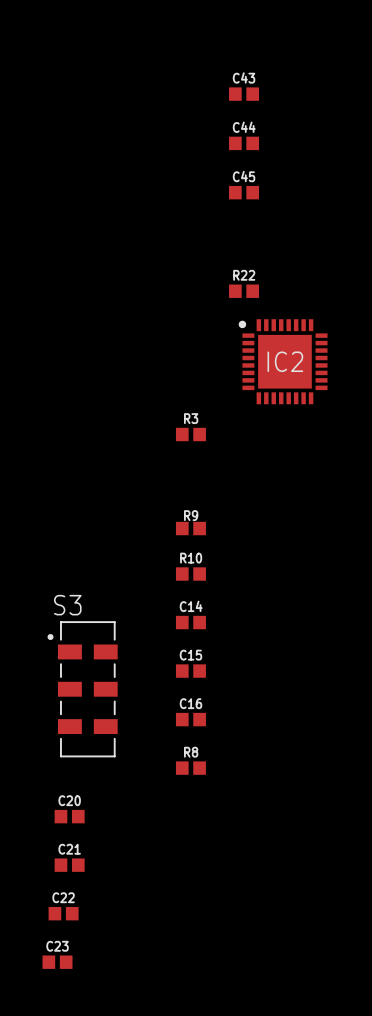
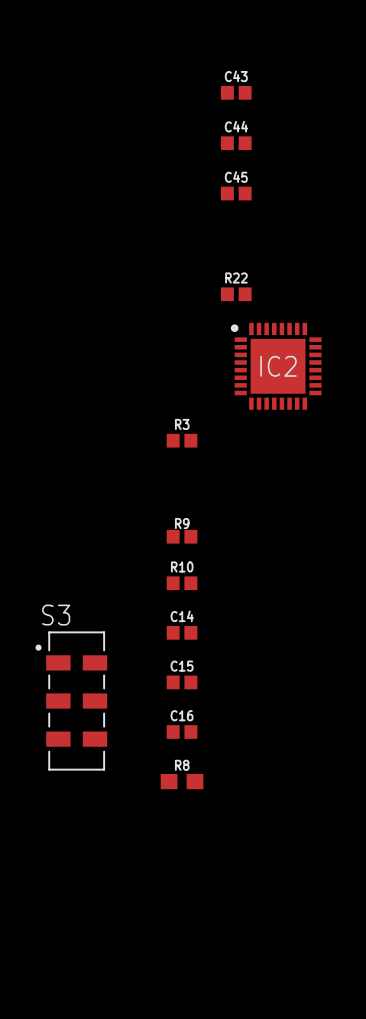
R8 footprint: [175, 761, 206, 775] -> [160, 773, 204, 790]
C20: (69, 816) -> none
C21: (69, 865) -> none
C22: (63, 913) -> none
C23: (57, 962) -> none

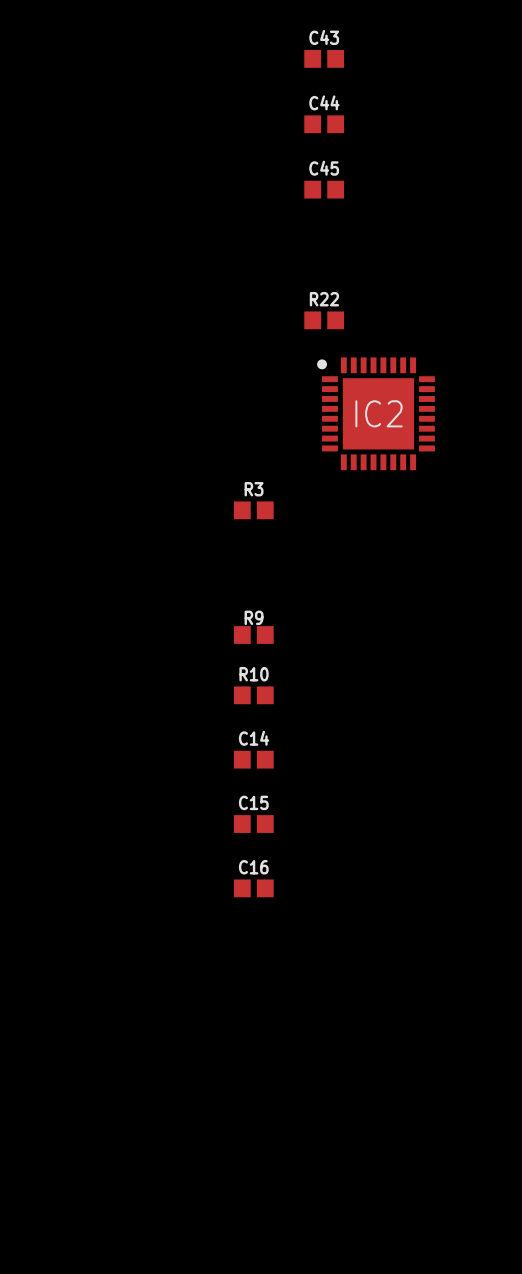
S3: (71, 701) -> none
R8: (182, 781) -> none

